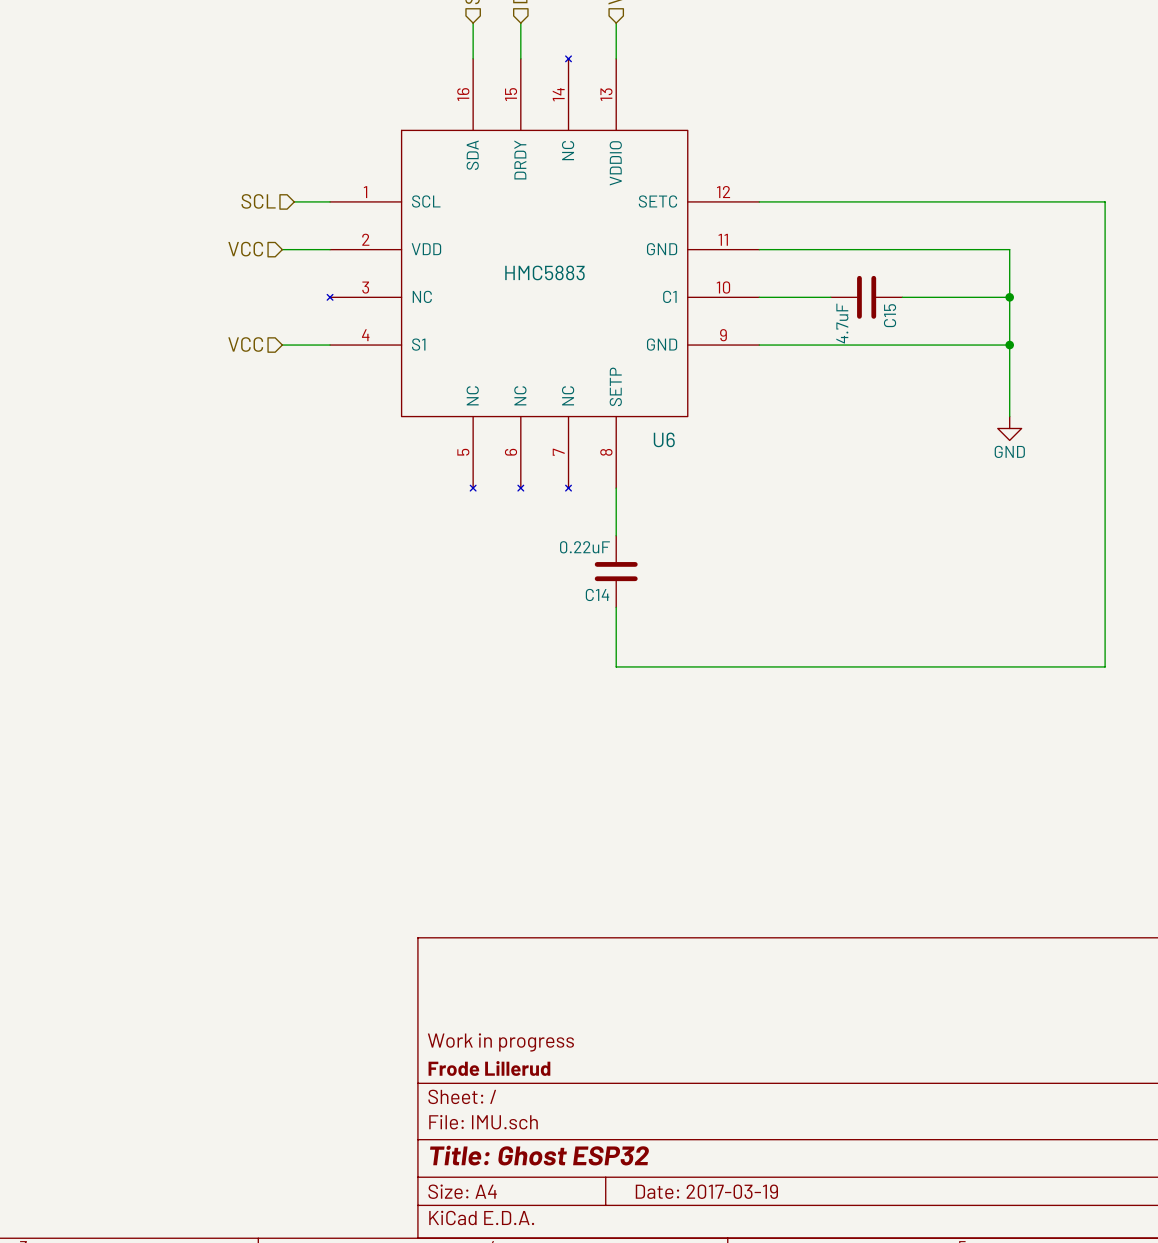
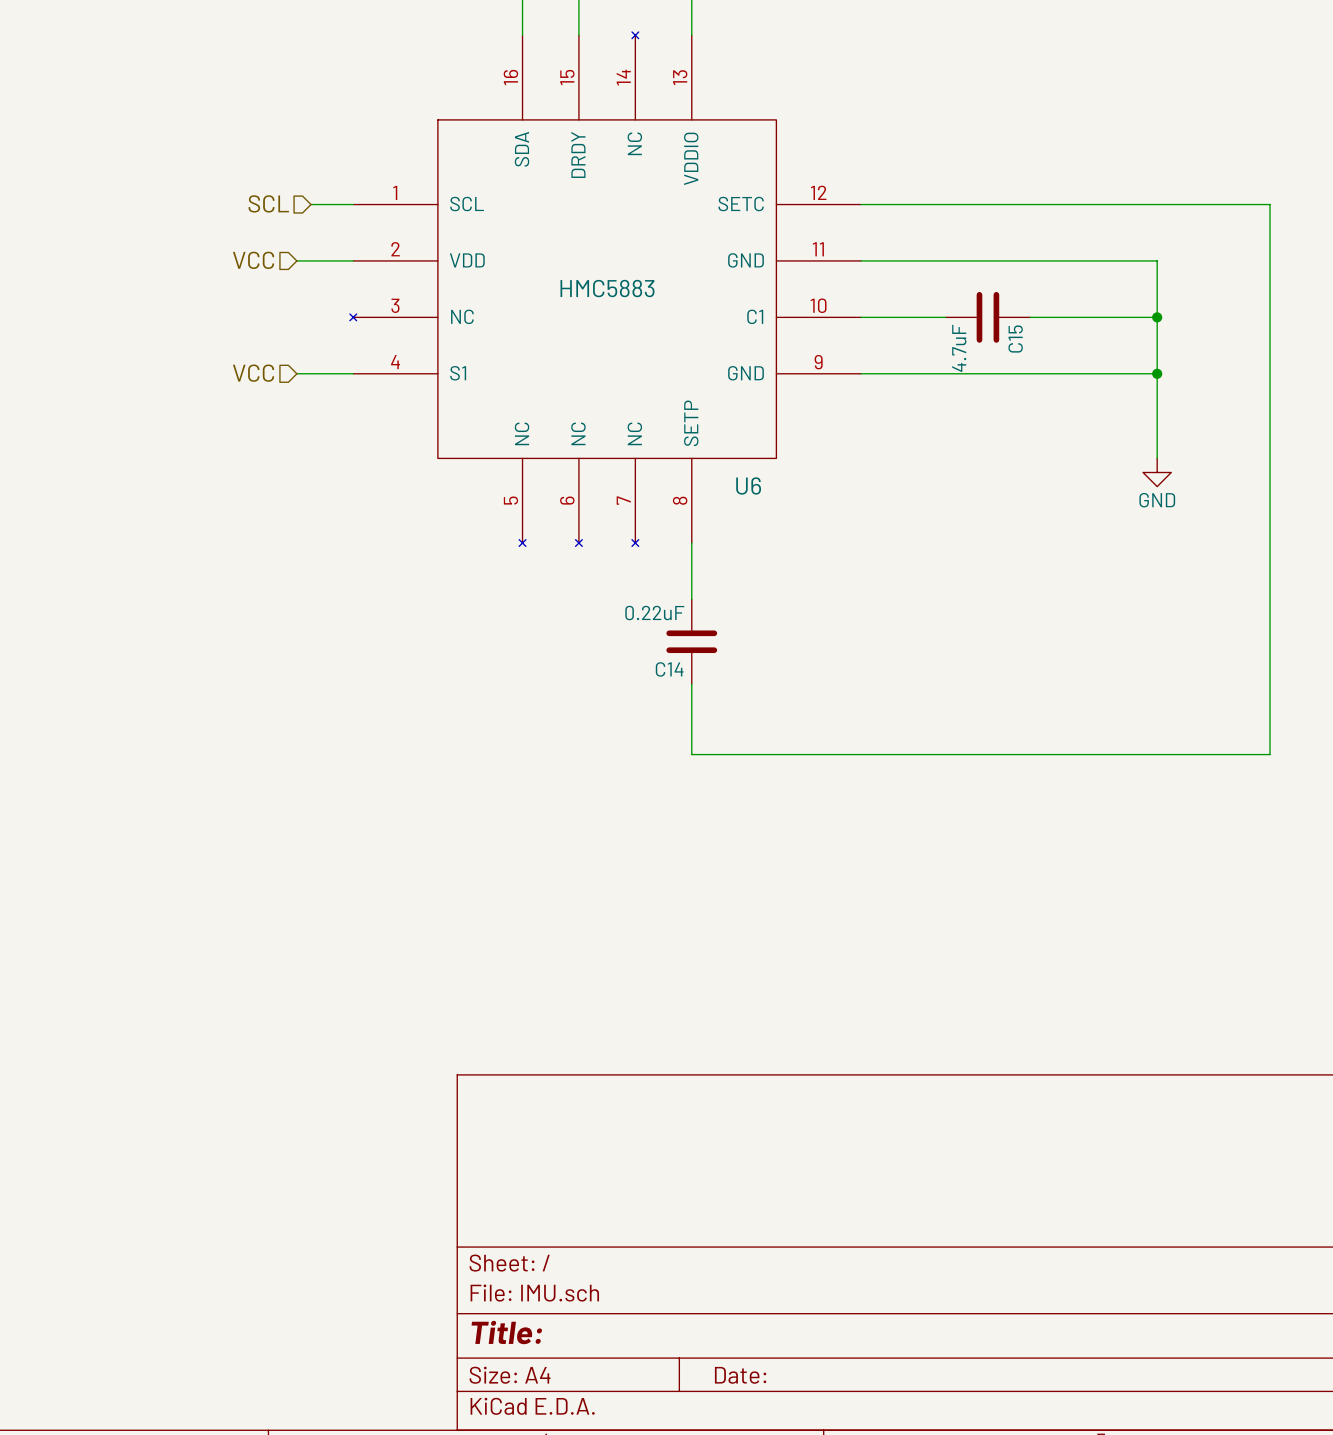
title block: Work in progress (500, 1042) -> none
title block: Frode Lillerud (489, 1068) -> none
title block: Title: Ghost ESP32 (539, 1155) -> Title: (506, 1332)
title block: Date: 2017-03-19 (706, 1191) -> Date: (740, 1375)

